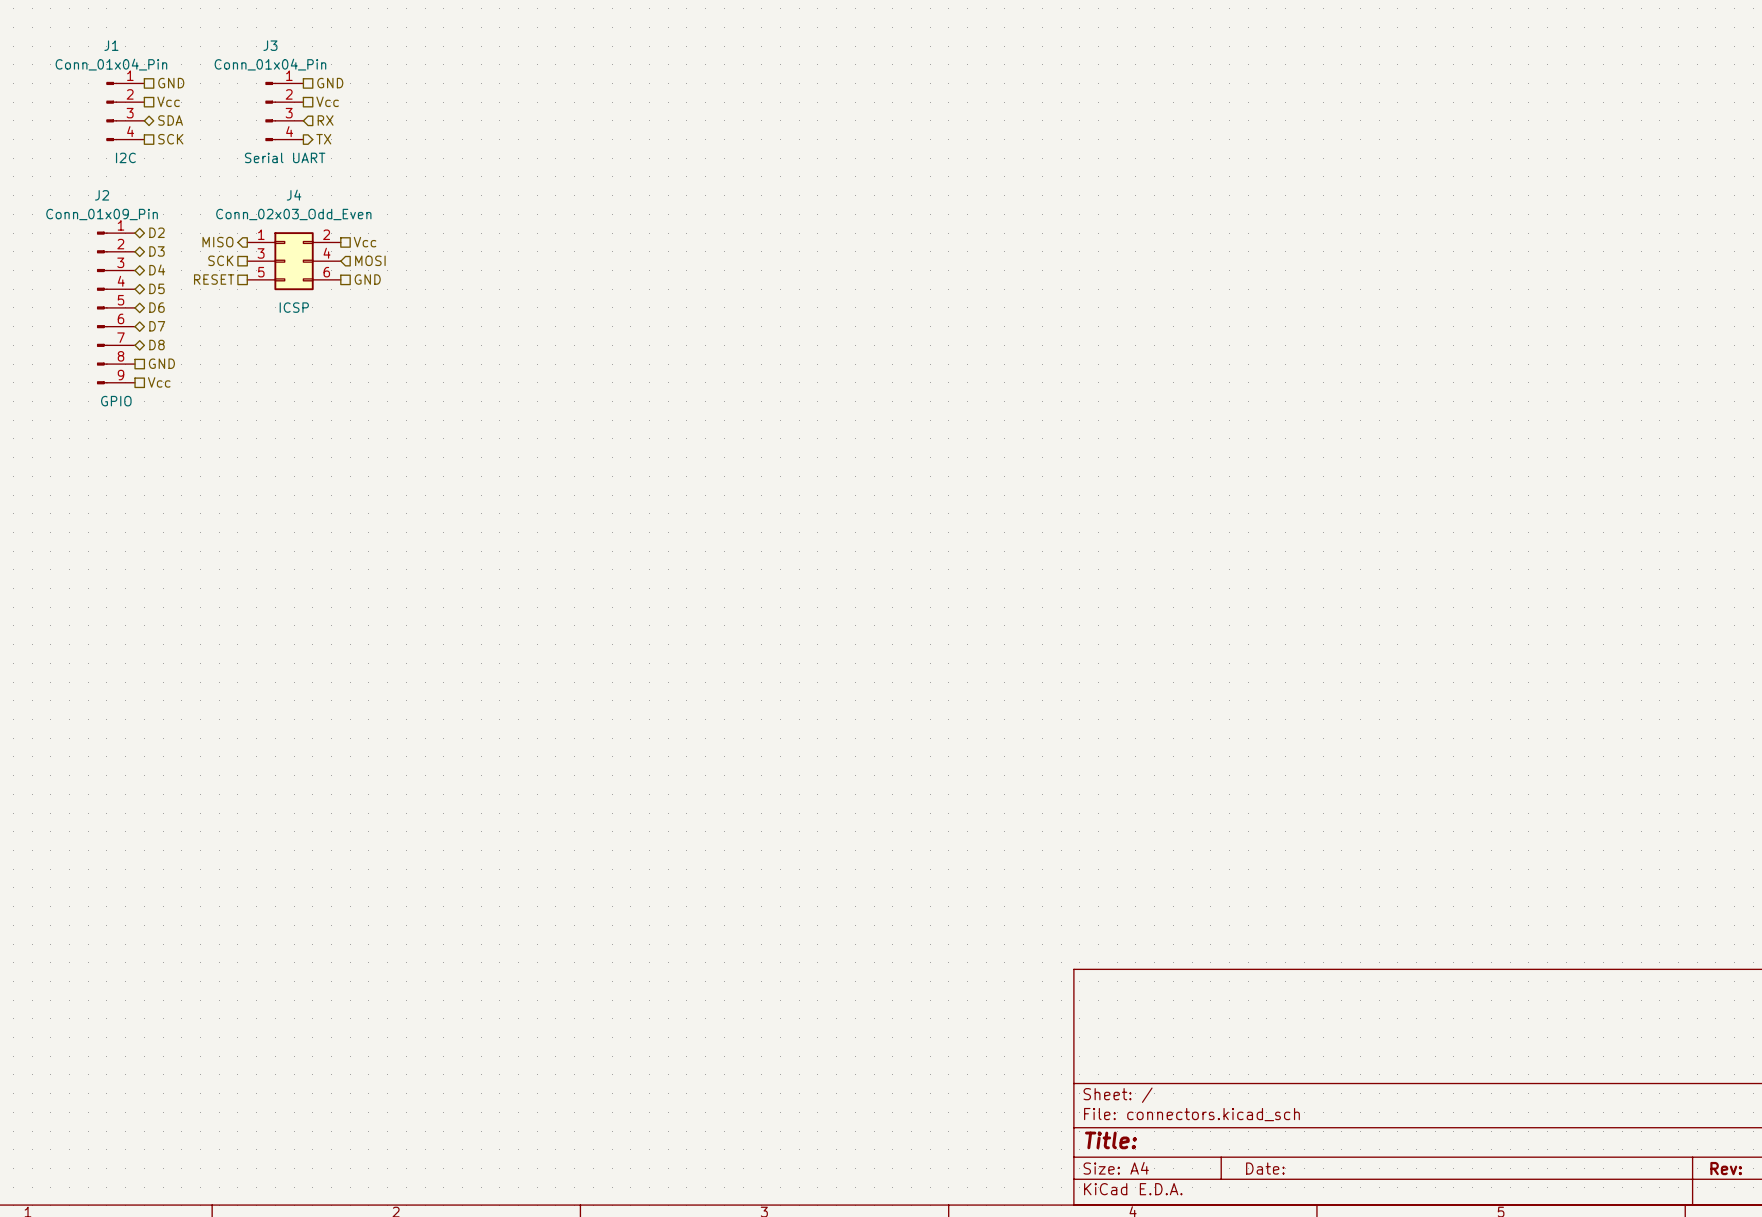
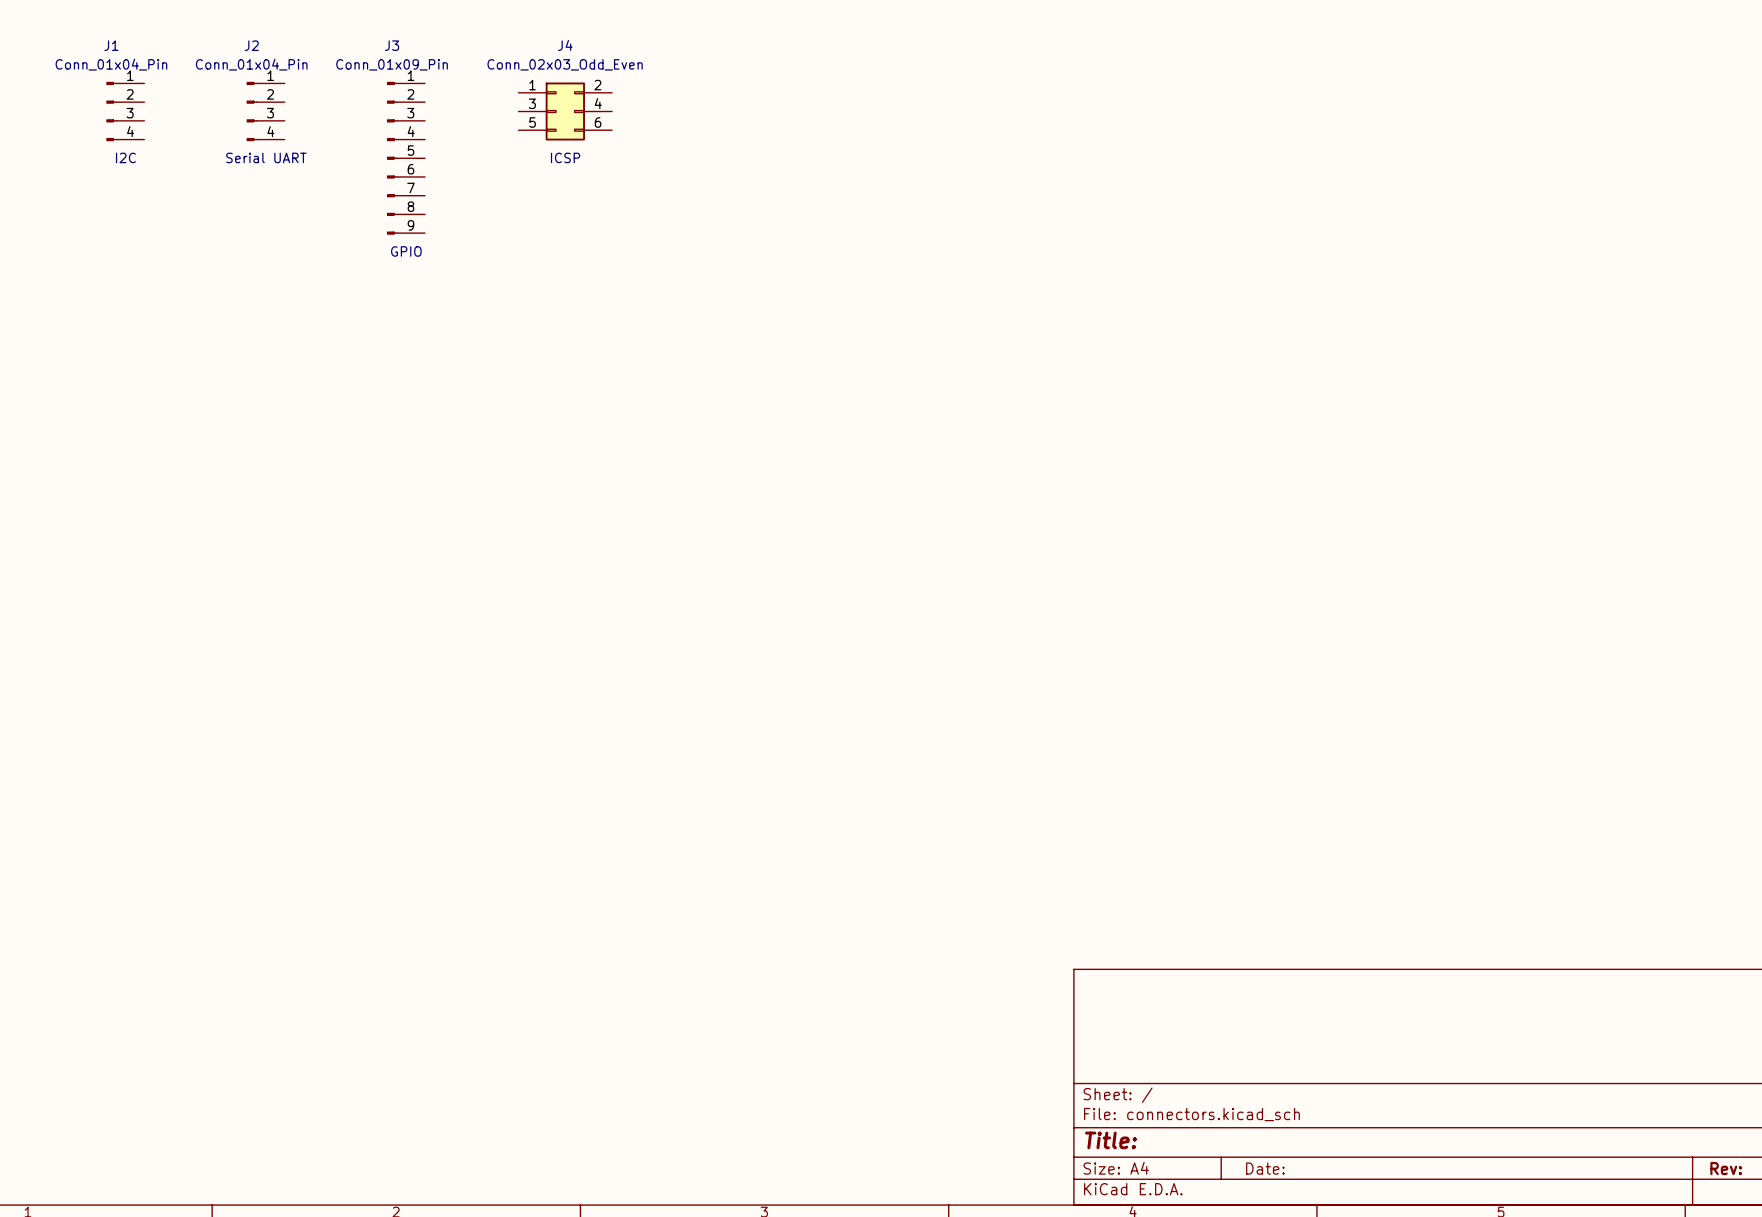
J3 name position: J3 (270, 45) -> J3 (392, 45)
J3 value: Conn_01x04_Pin (270, 64) -> Conn_01x09_Pin (392, 64)
J3 symbol: [265, 81, 304, 142] -> [387, 81, 426, 235]
hierarchical label: GND (171, 83) -> none
hierarchical label: GND (330, 83) -> none
hierarchical label: Vcc (168, 101) -> none
hierarchical label: Vcc (327, 101) -> none
hierarchical label: SDA (170, 120) -> none
hierarchical label: RX (325, 120) -> none
hierarchical label: SCK (170, 139) -> none
hierarchical label: TX (323, 139) -> none
J3 text: Serial UART (285, 157) -> GPIO (406, 251)
J2 name position: J2 (102, 195) -> J2 (251, 45)
J2 value: Conn_01x09_Pin (102, 214) -> Conn_01x04_Pin (251, 64)
J2 symbol: [97, 231, 136, 385] -> [246, 81, 285, 142]
hierarchical label: D2 (157, 232) -> none
hierarchical label: MISO (217, 242) -> none
hierarchical label: Vcc (365, 242) -> none
hierarchical label: D3 (157, 251) -> none
hierarchical label: SCK (220, 260) -> none
hierarchical label: MOSI (370, 260) -> none
J4 position: (294, 261) -> (565, 111)
hierarchical label: D4 (157, 269) -> none
hierarchical label: RESET (214, 279) -> none
hierarchical label: GND (367, 279) -> none
hierarchical label: D5 (157, 288) -> none
hierarchical label: D6 (157, 307) -> none
hierarchical label: D7 (157, 326) -> none
hierarchical label: D8 (157, 345) -> none
hierarchical label: GND (161, 363) -> none
hierarchical label: Vcc (159, 382) -> none
J2 text: GPIO (116, 401) -> Serial UART (266, 157)

